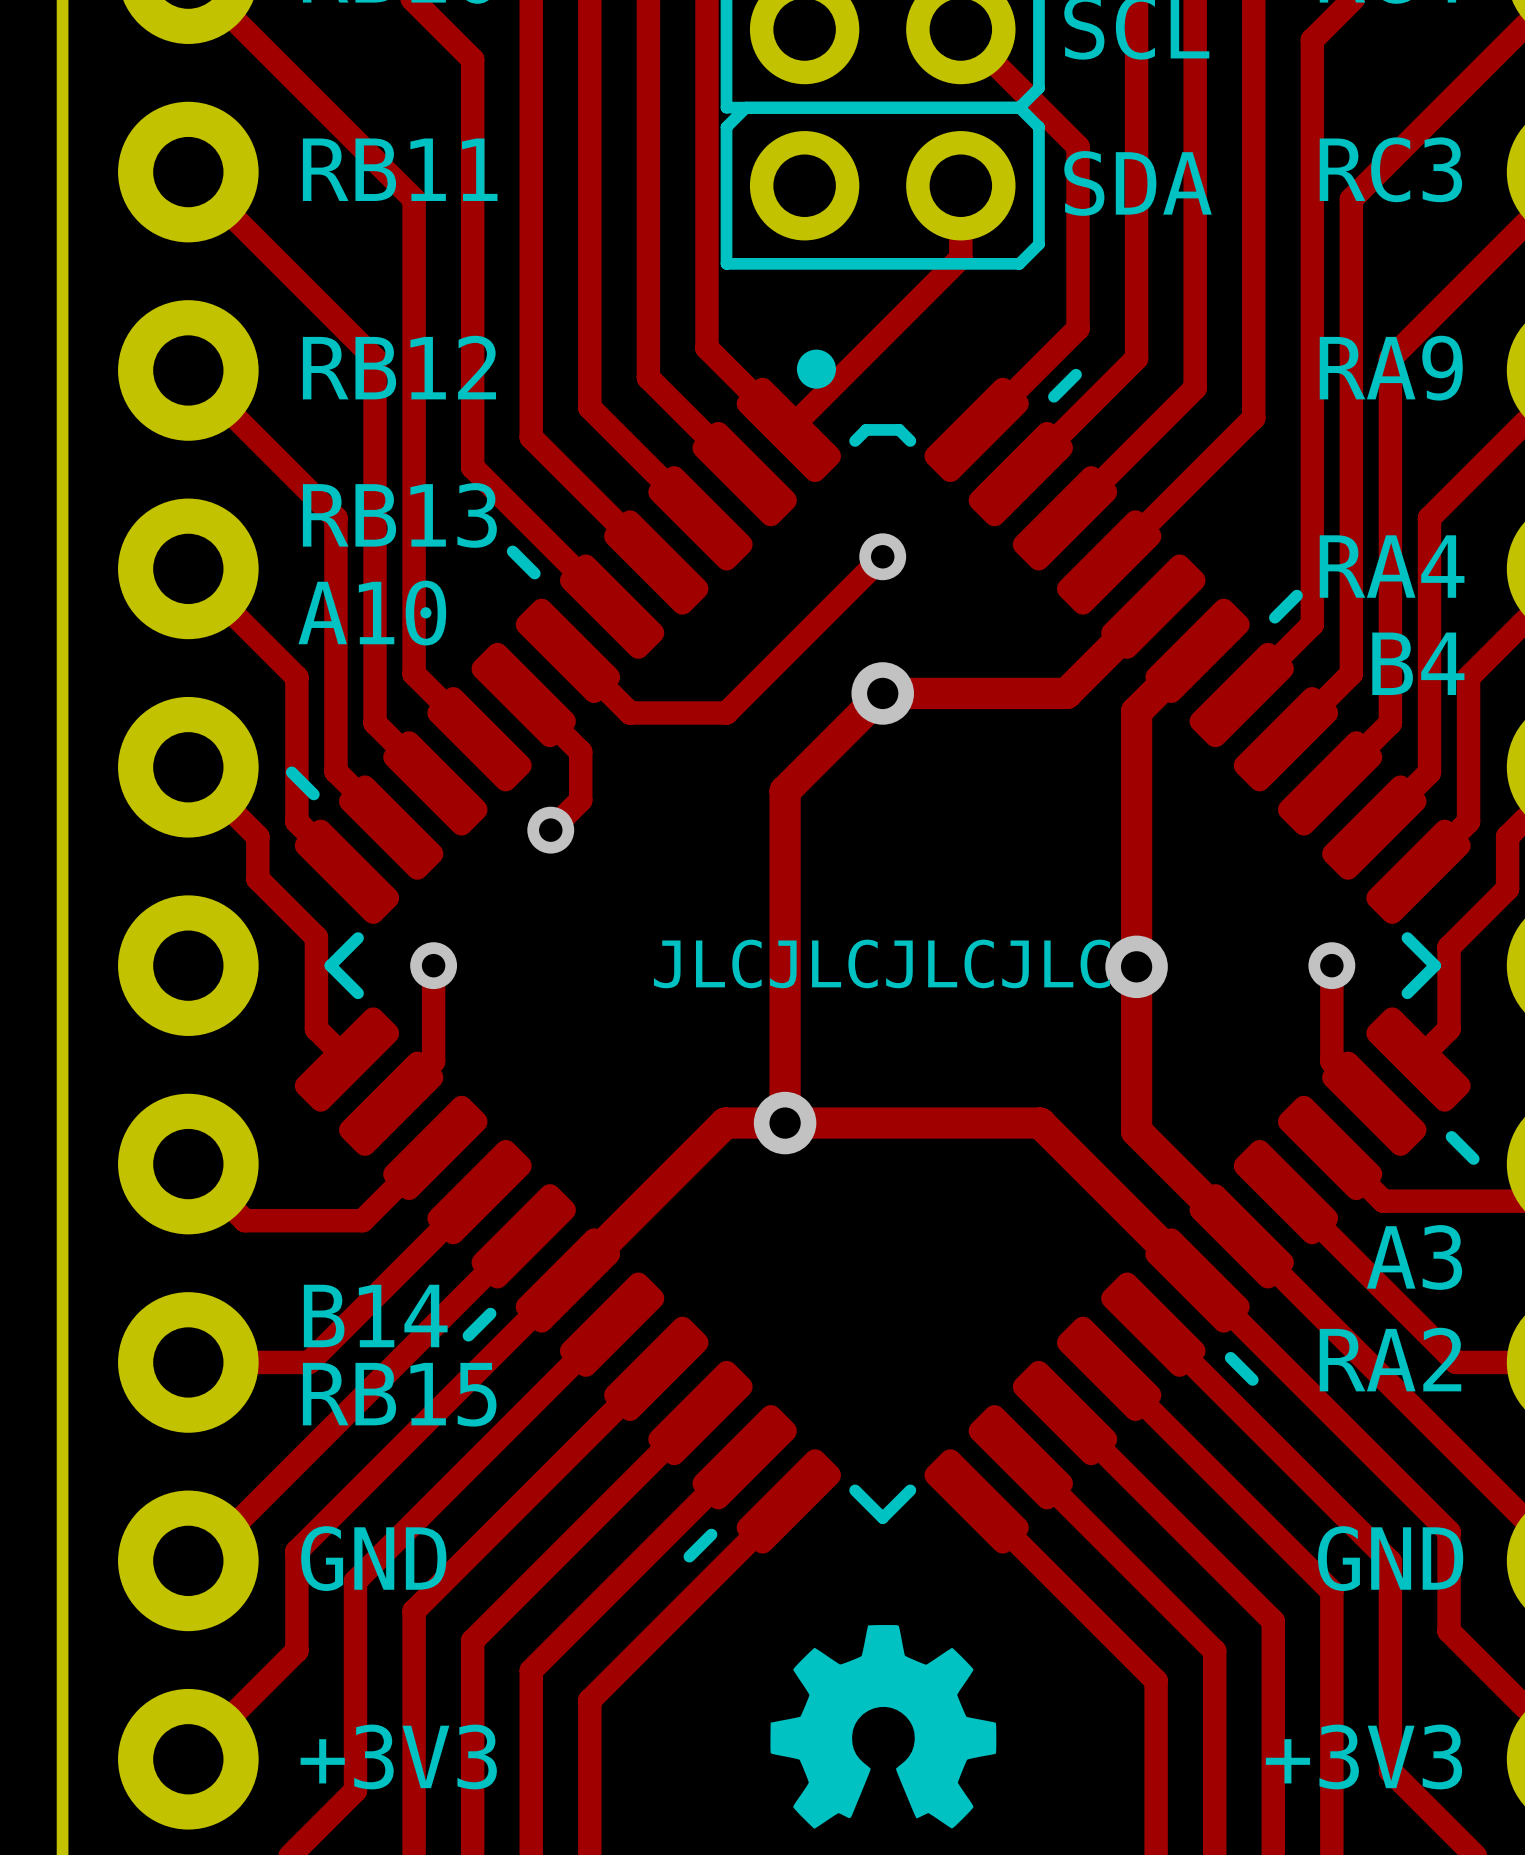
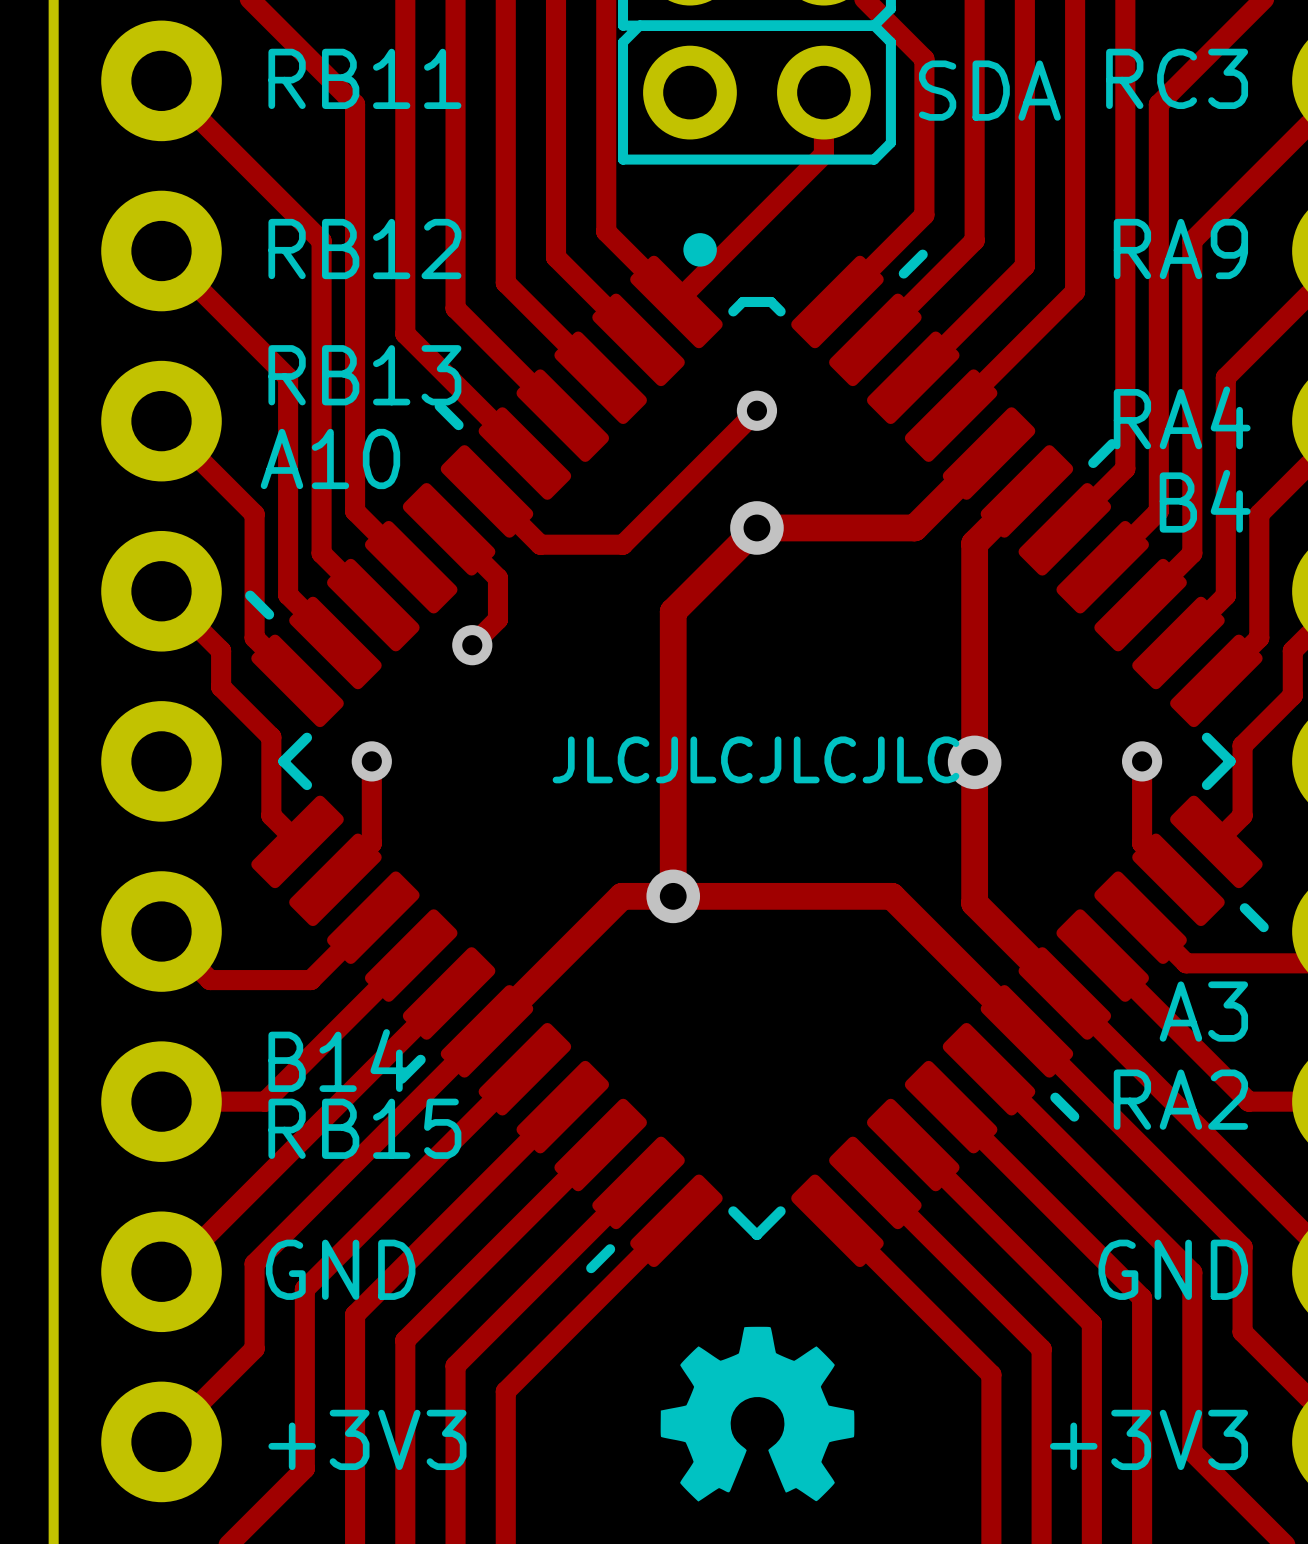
part footprint: [285, 349, 1480, 1563] -> [245, 233, 1269, 1274]

